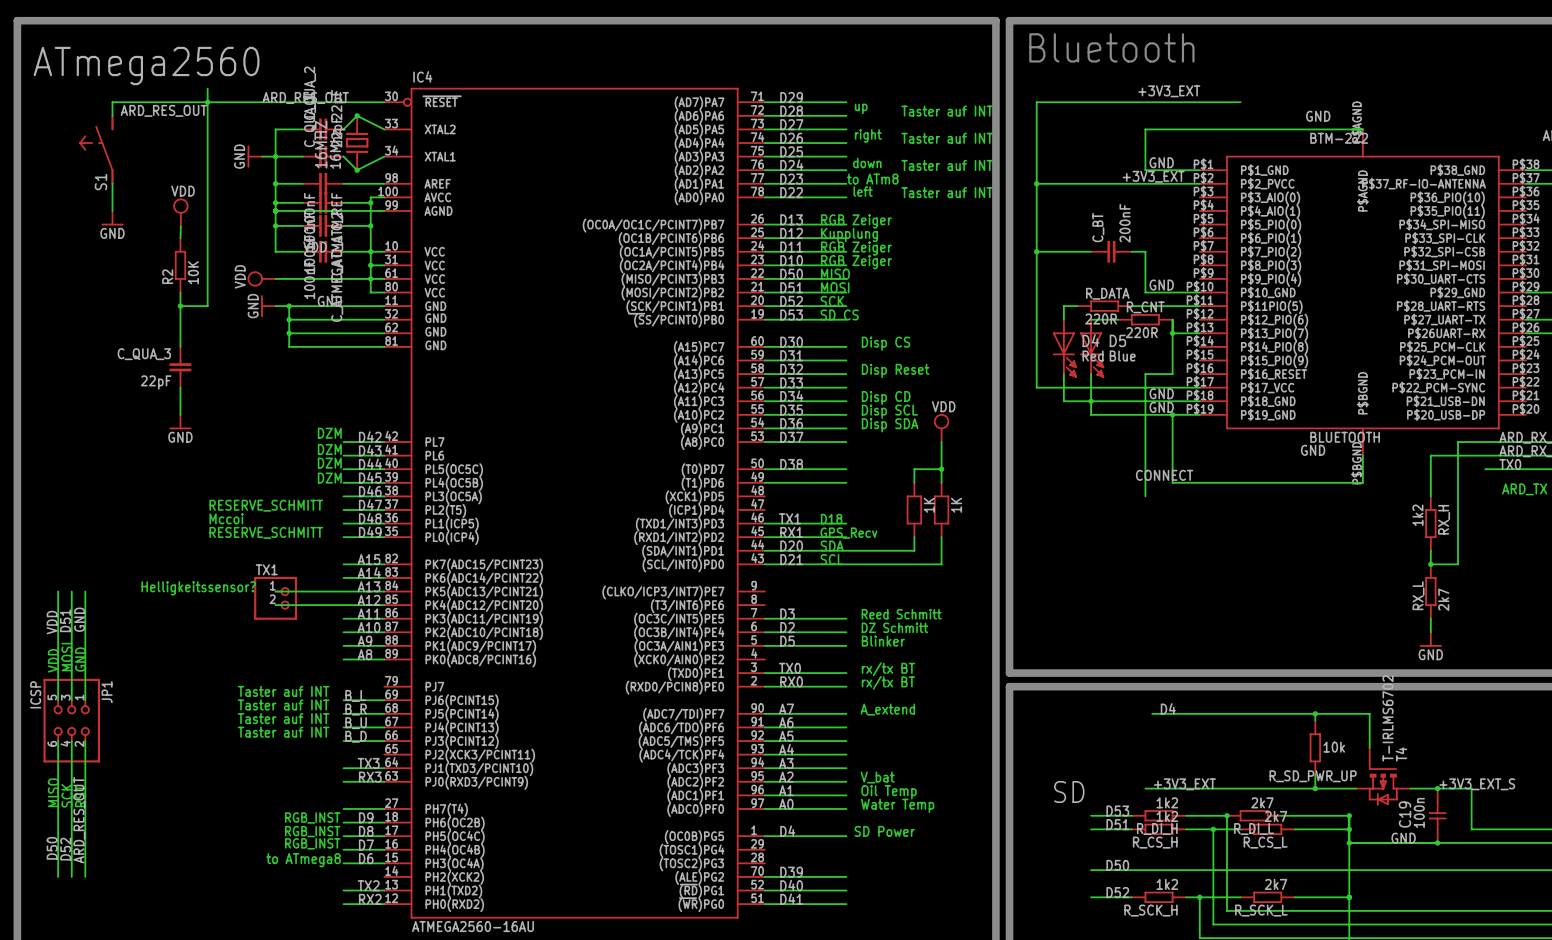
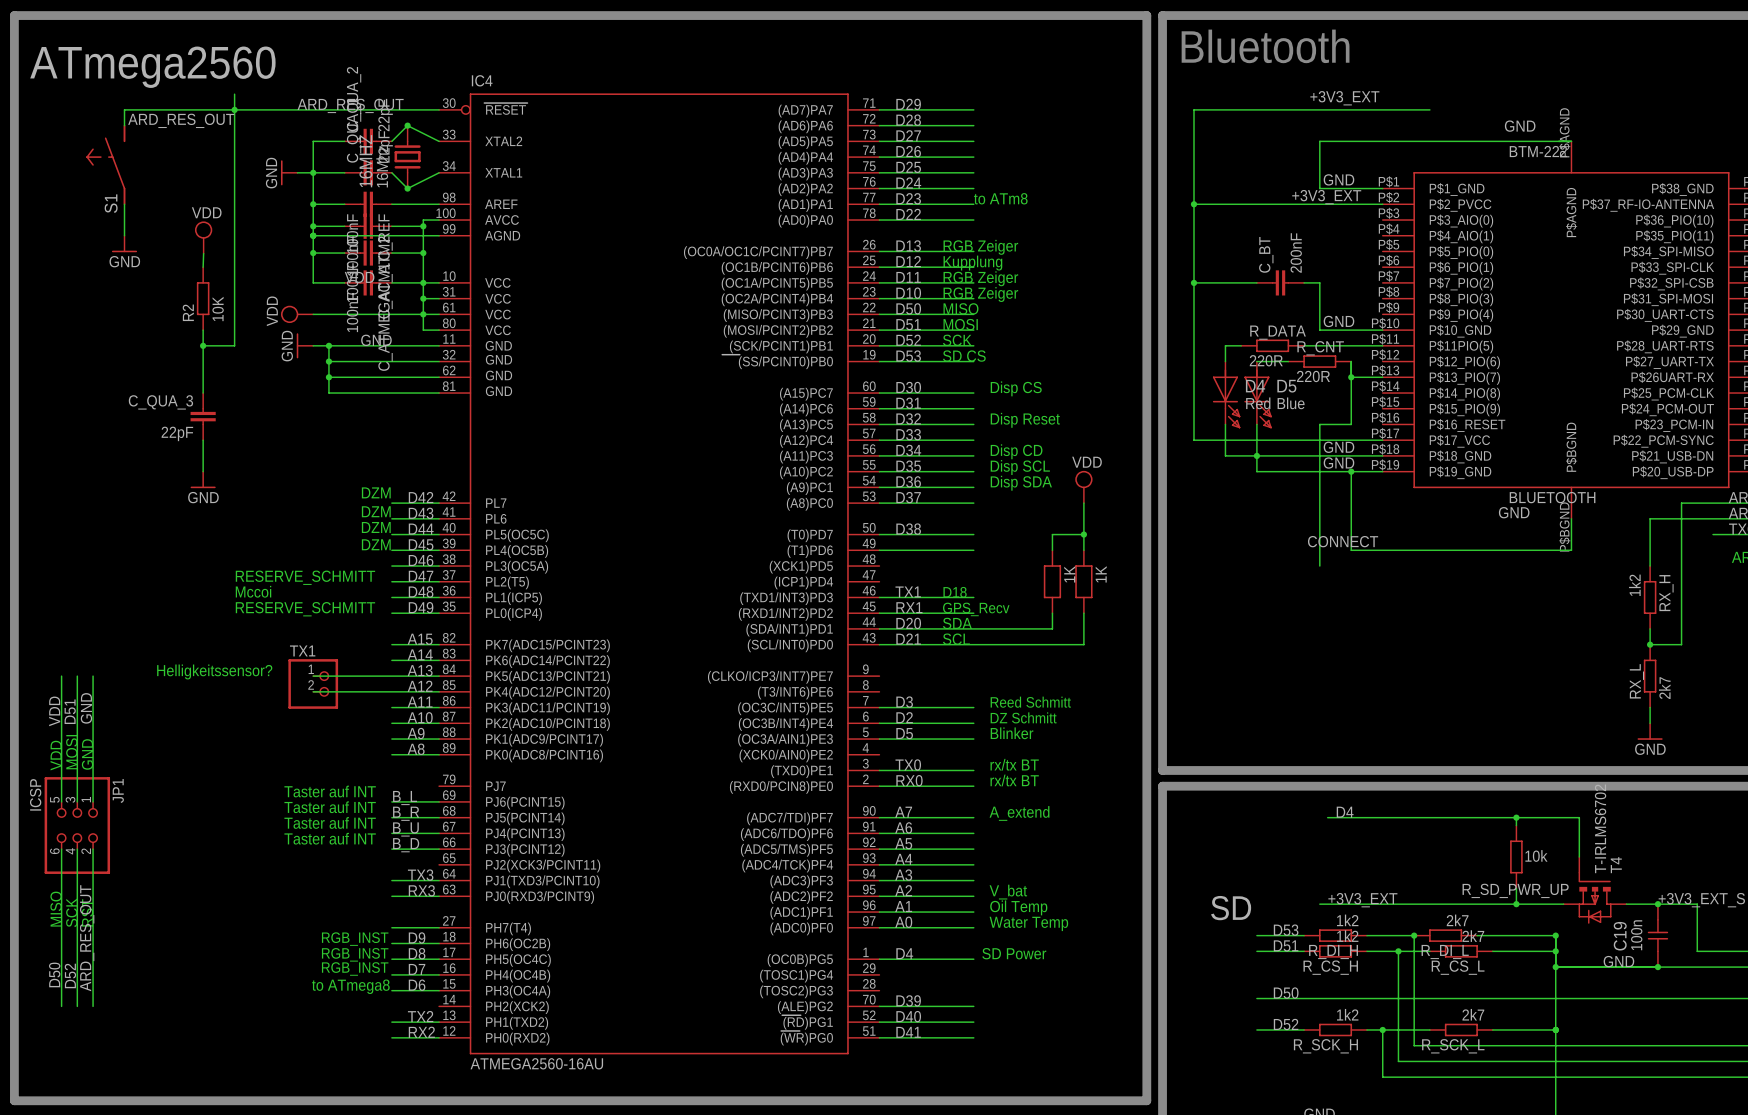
text: up (861, 108) -> none
text: Taster auf INT (947, 111) -> none
text: right (868, 135) -> none
text: Taster auf INT (947, 138) -> none
text: down (867, 163) -> none
text: Taster auf INT (947, 165) -> none
text: left (863, 191) -> none
text: Taster auf INT (947, 192) -> none

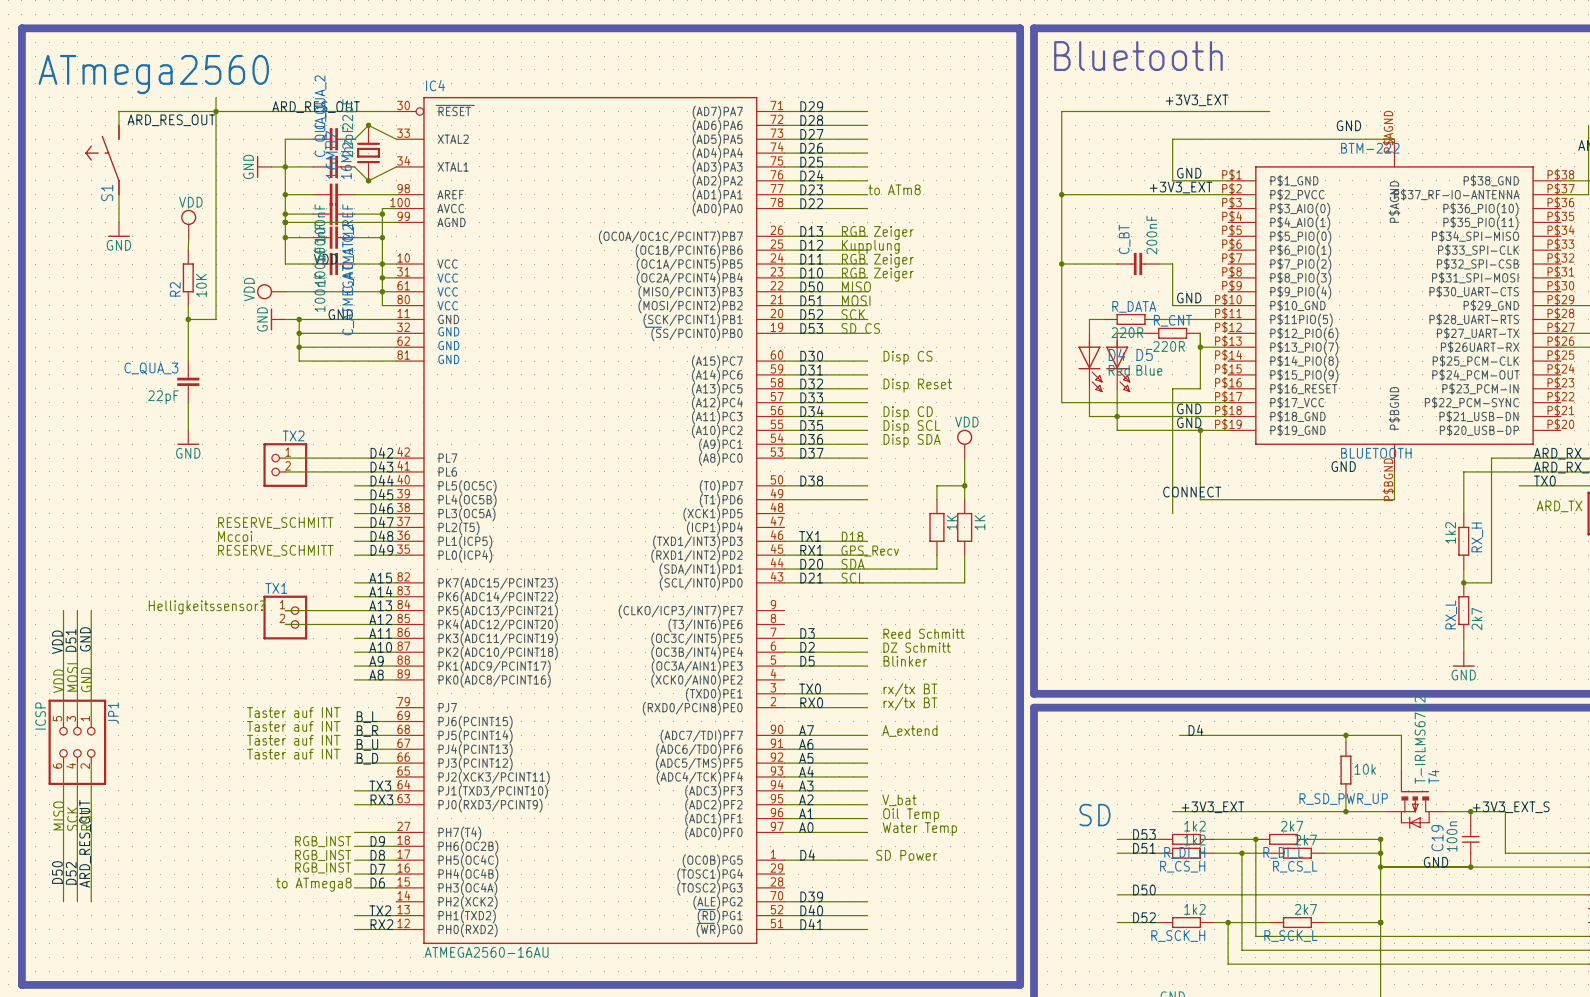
text: DZM (376, 492) -> none
wire: none -> (285, 458) (354, 458)
TX2: none -> (285, 465)
text: DZM (376, 511) -> none
wire: none -> (285, 471) (354, 471)
text: DZM (376, 527) -> none
text: DZM (376, 544) -> none

